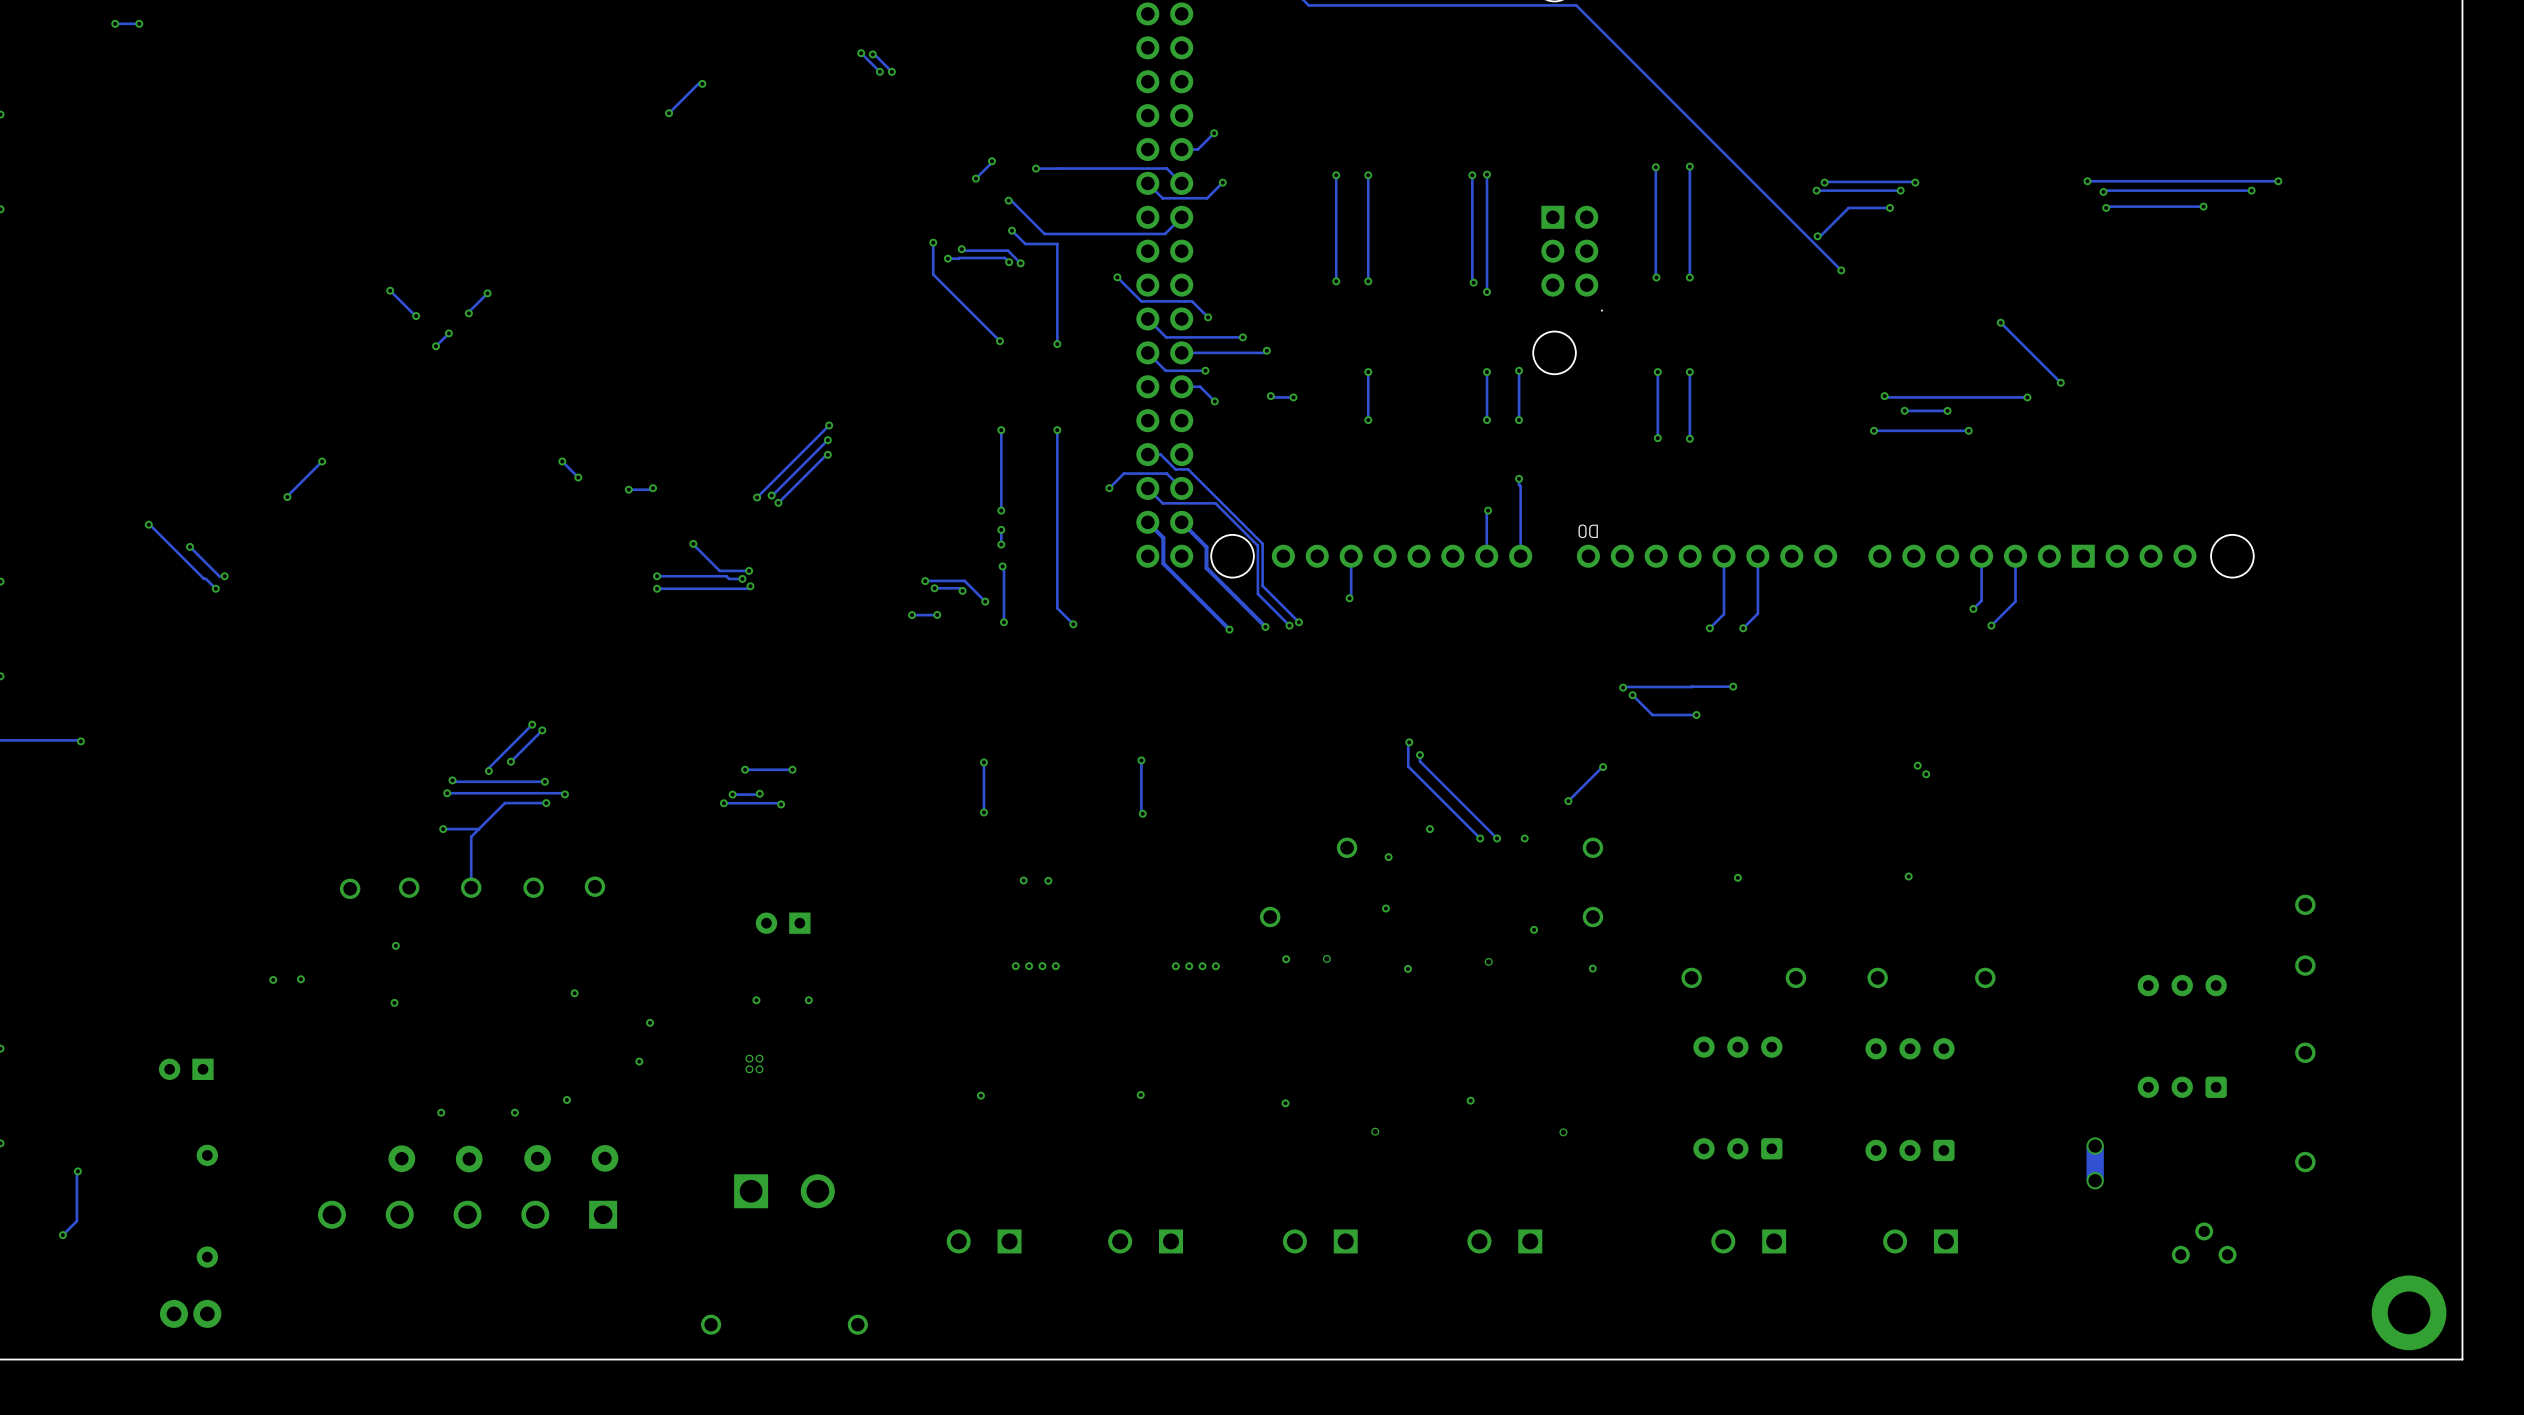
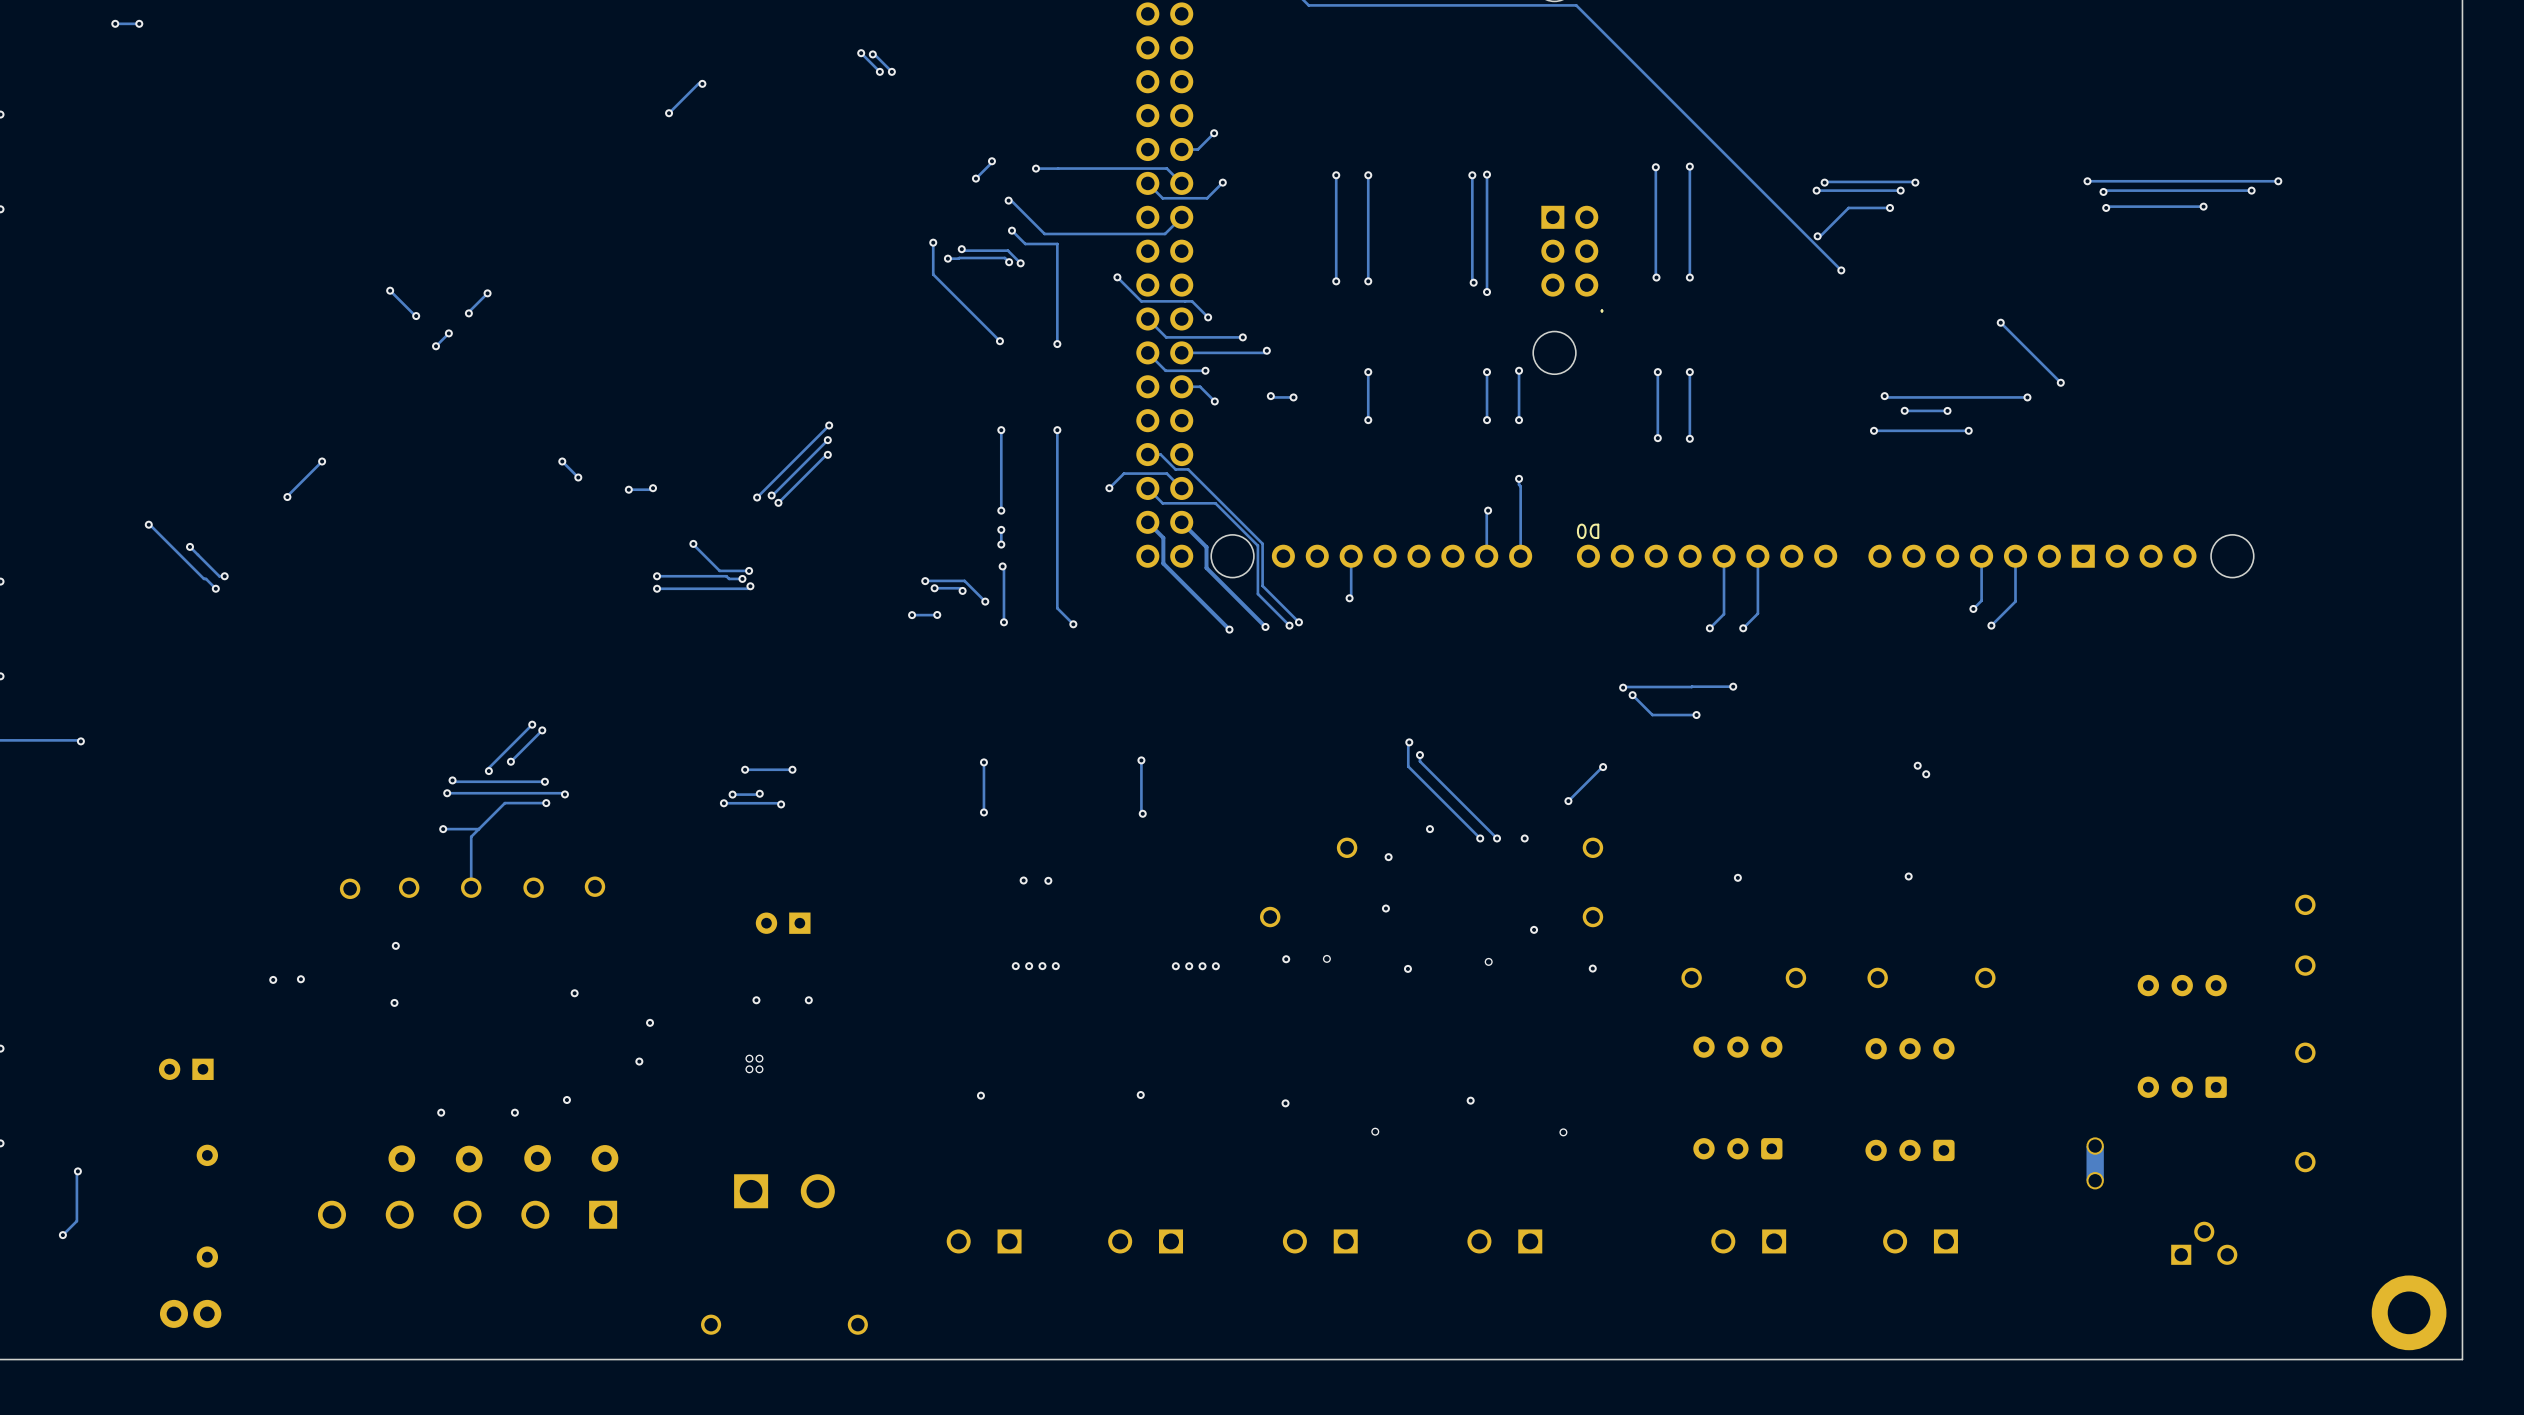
part footprint: [2171, 1222, 2237, 1264] -> [2171, 1221, 2238, 1265]

